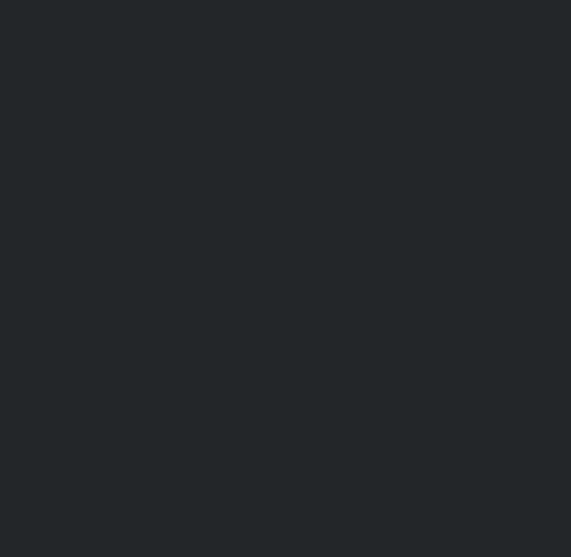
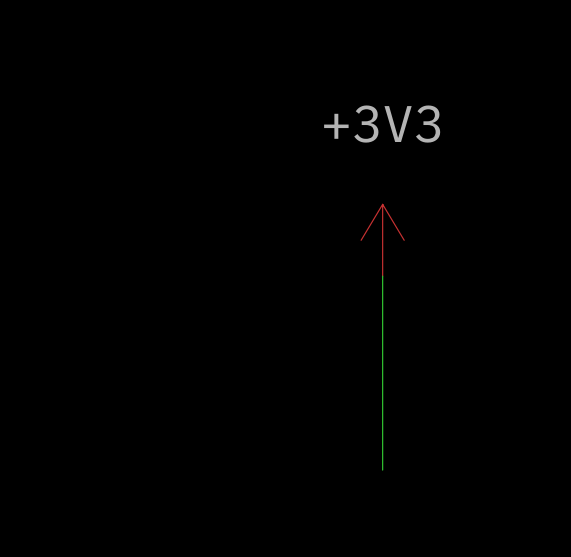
power symbol: none -> +3V3 (382, 240)
wire: none -> (382, 276) (382, 470)

